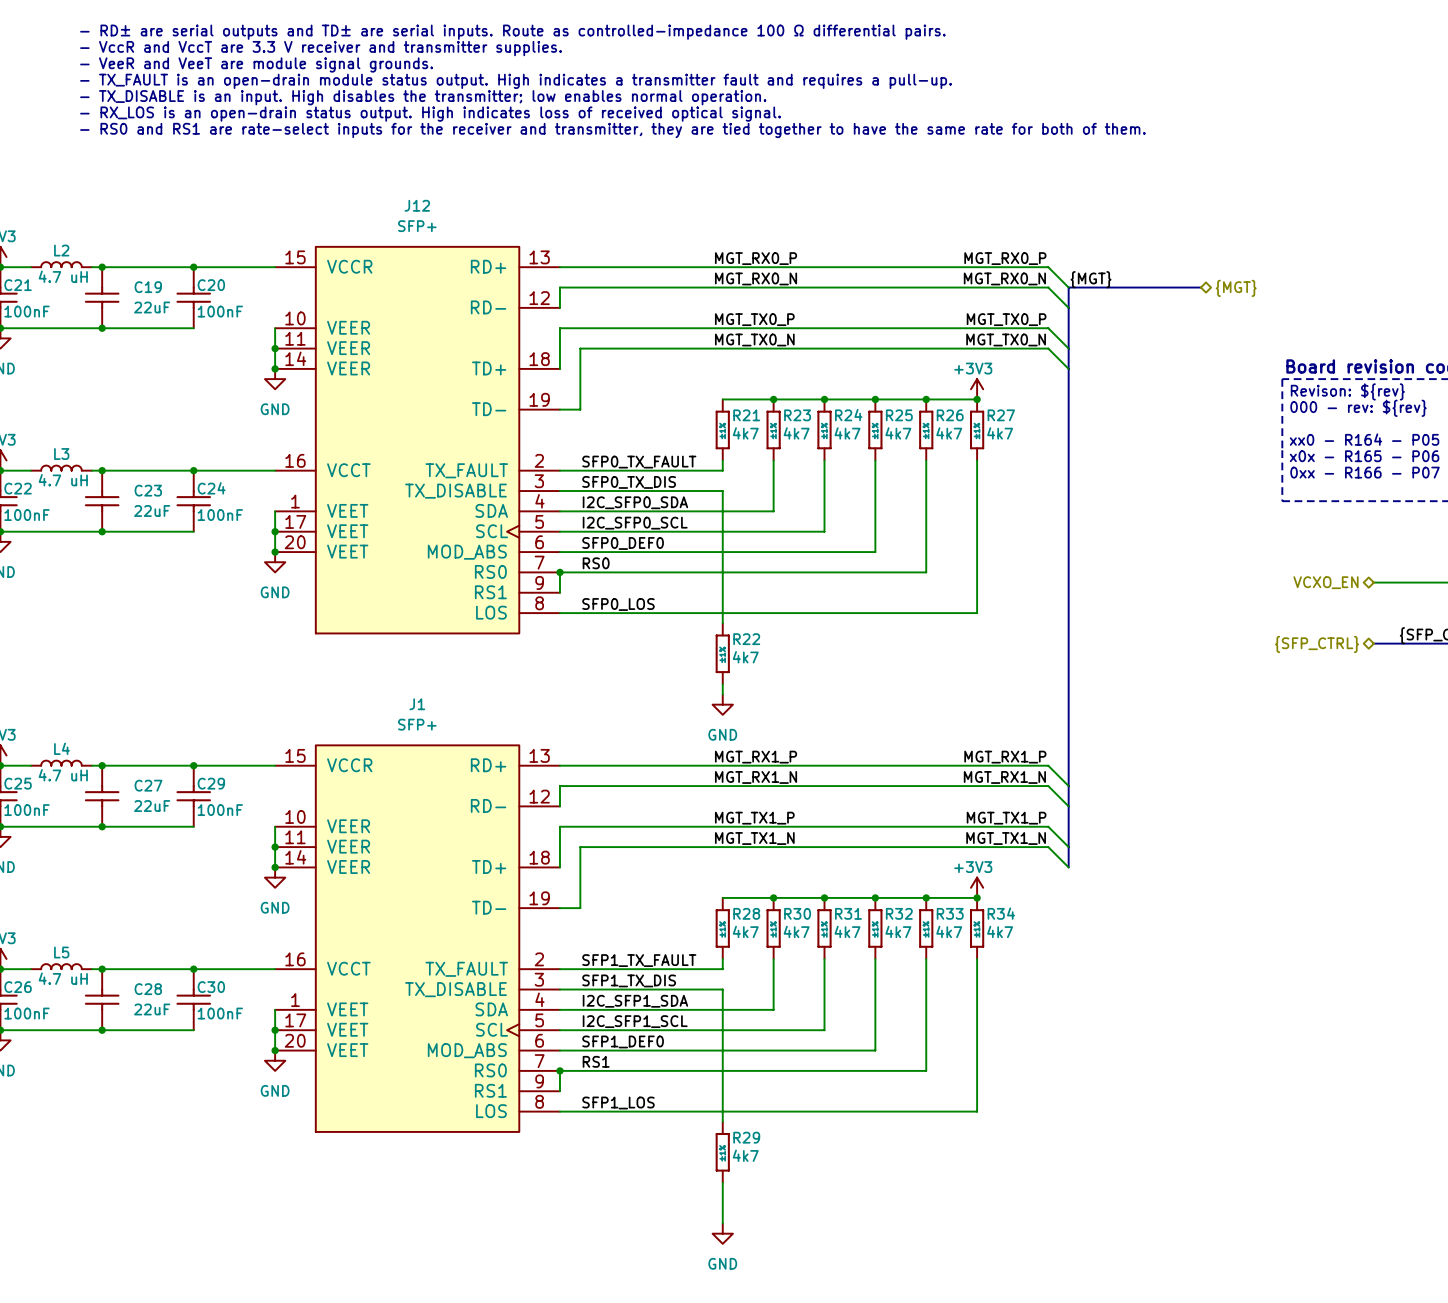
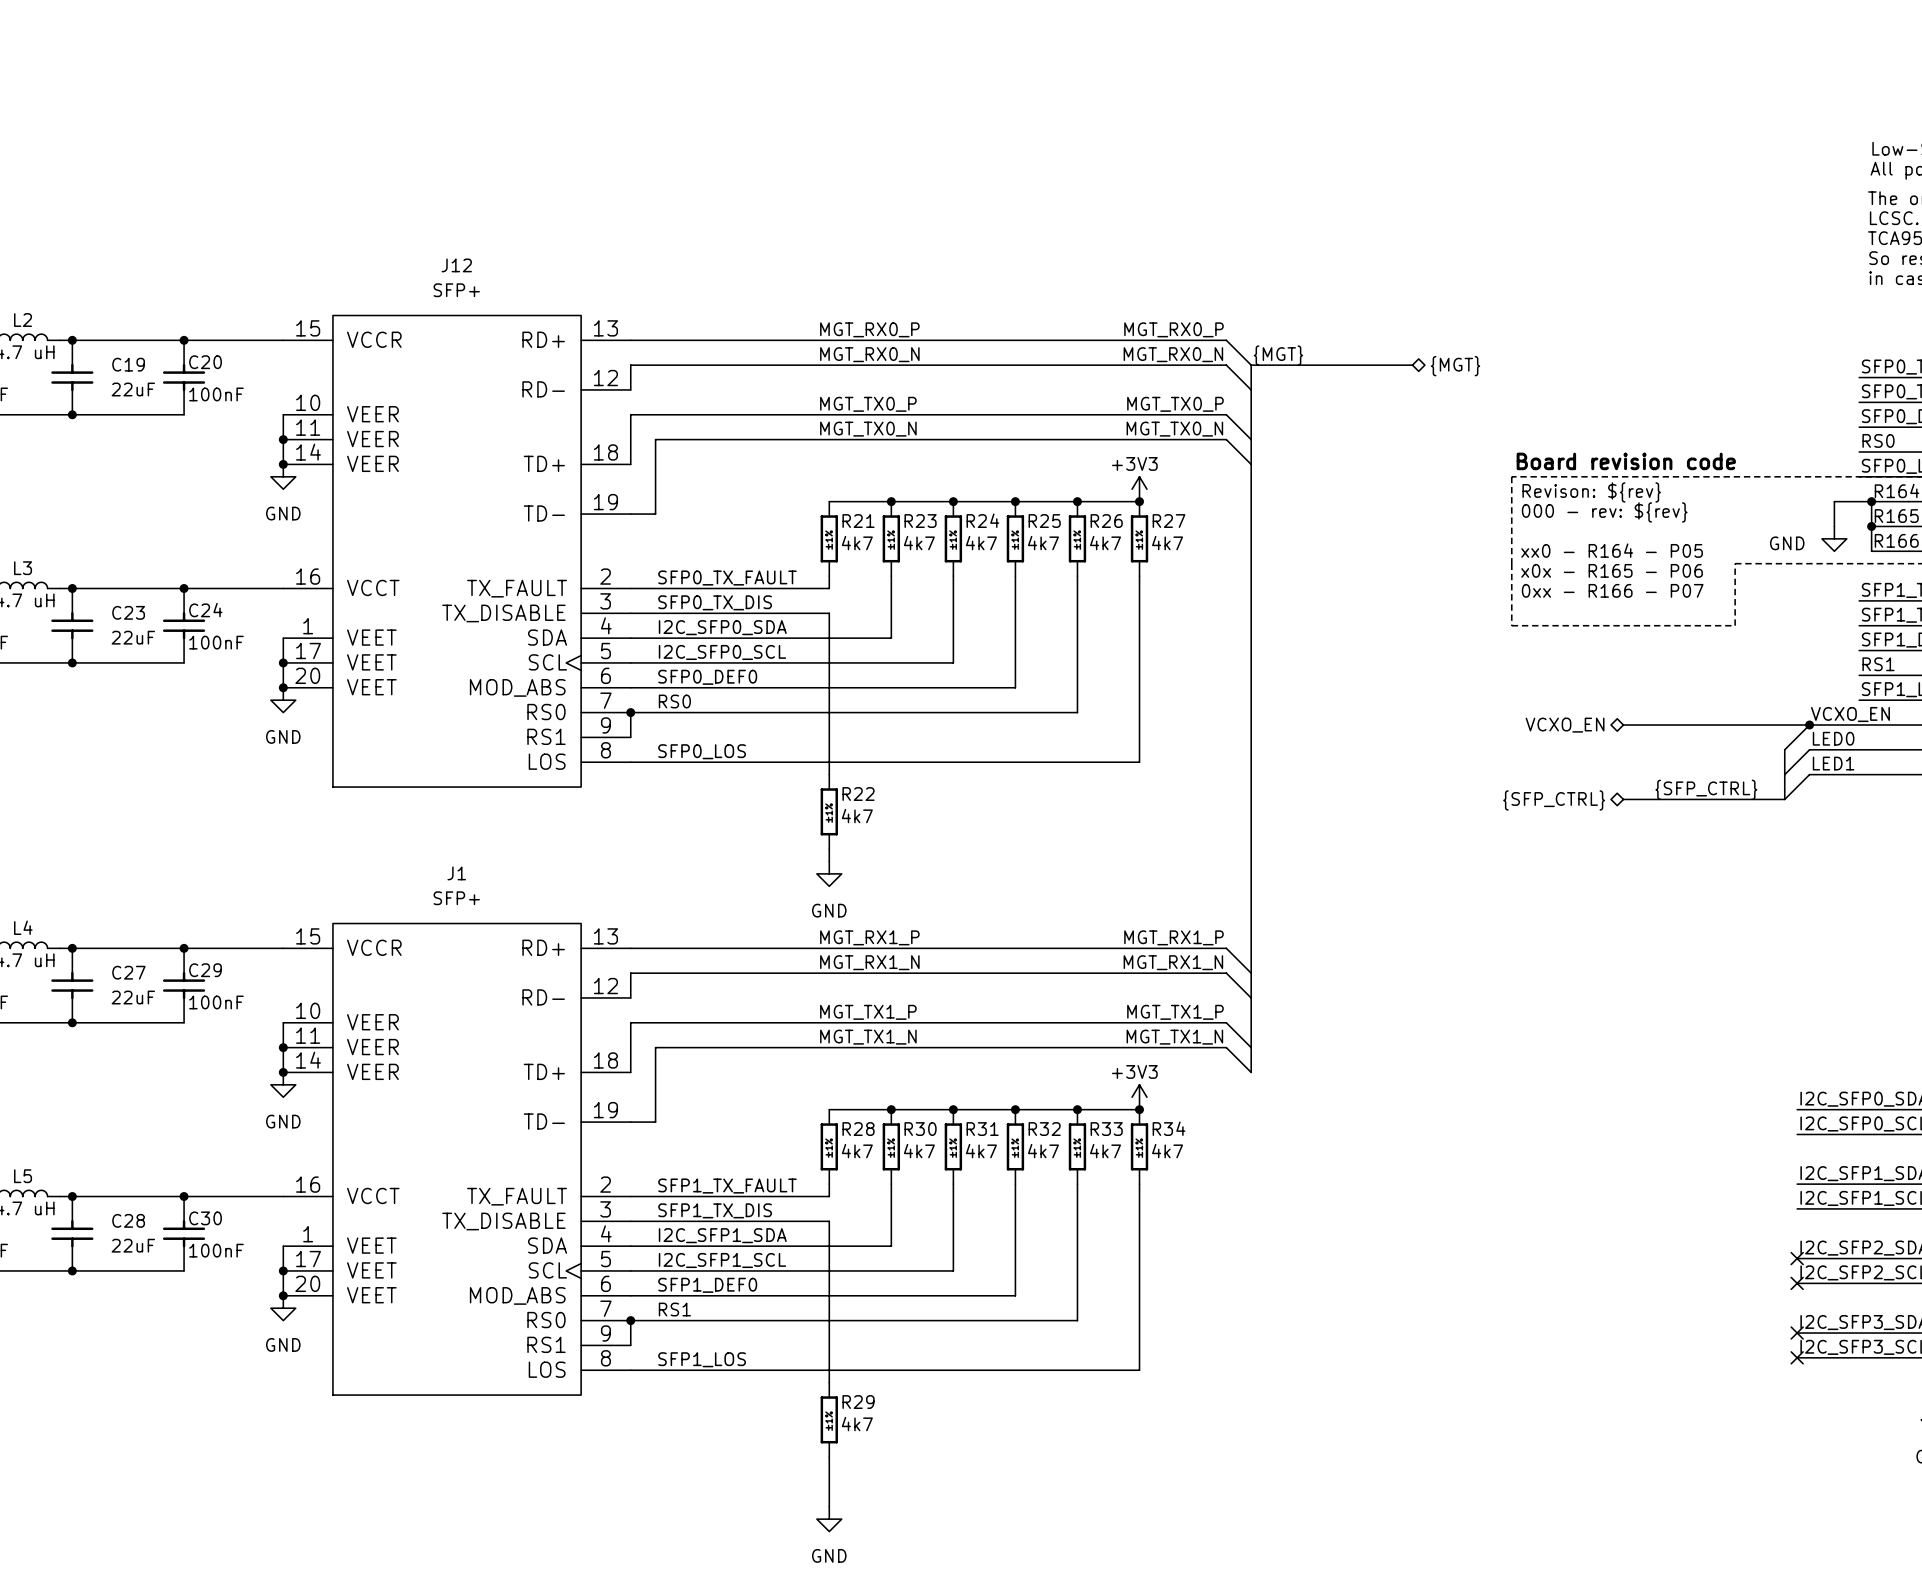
text: - RD± are serial outputs and TD± are serial inputs. Route as controlled-impedance 100 Ω differential pairs. (512, 32) -> none
text: - VccR and VccT are 3.3 V receiver and transmitter supplies. (321, 48) -> none
text: - VeeR and VeeT are module signal grounds. (256, 64) -> none
text: - TX_FAULT is an open-drain module status output. High indicates a transmitter fault and requires a pull-up. (516, 81) -> none
text: - TX_DISABLE is an input. High disables the transmitter; low enables normal operation. (423, 97) -> none
text: - RX_LOS is an open-drain status output. High indicates loss of received optical signal. (430, 114) -> none
text: - RS0 and RS1 are rate-select inputs for the receiver and transmitter, they are tied together to have the same rate for both of them. (612, 130) -> none

